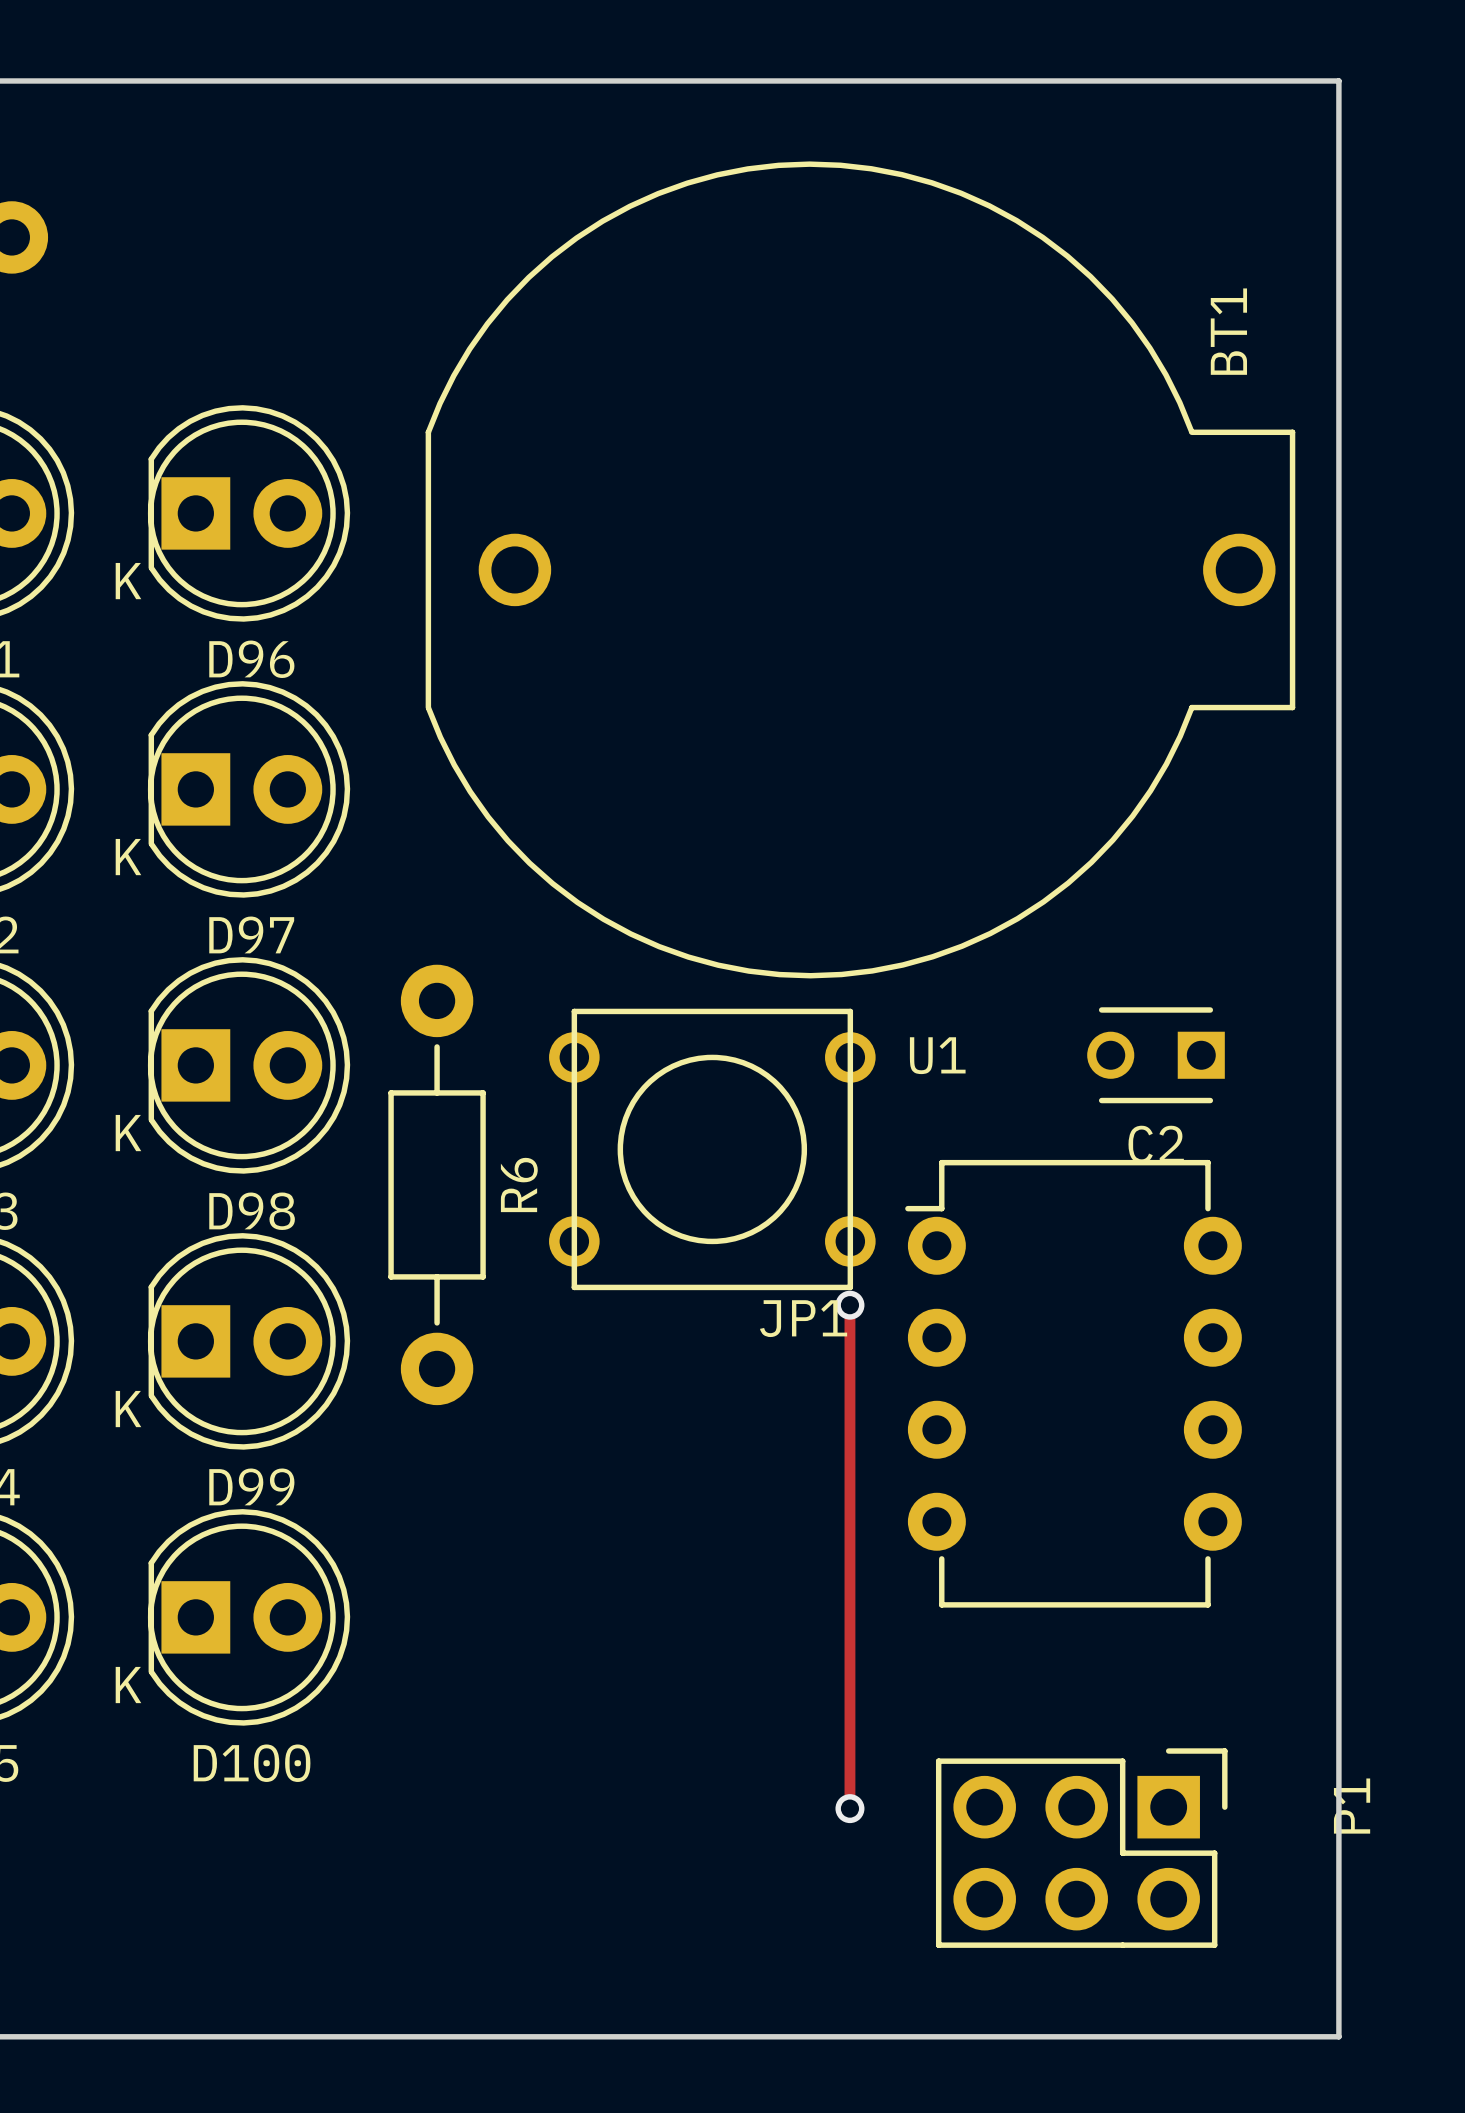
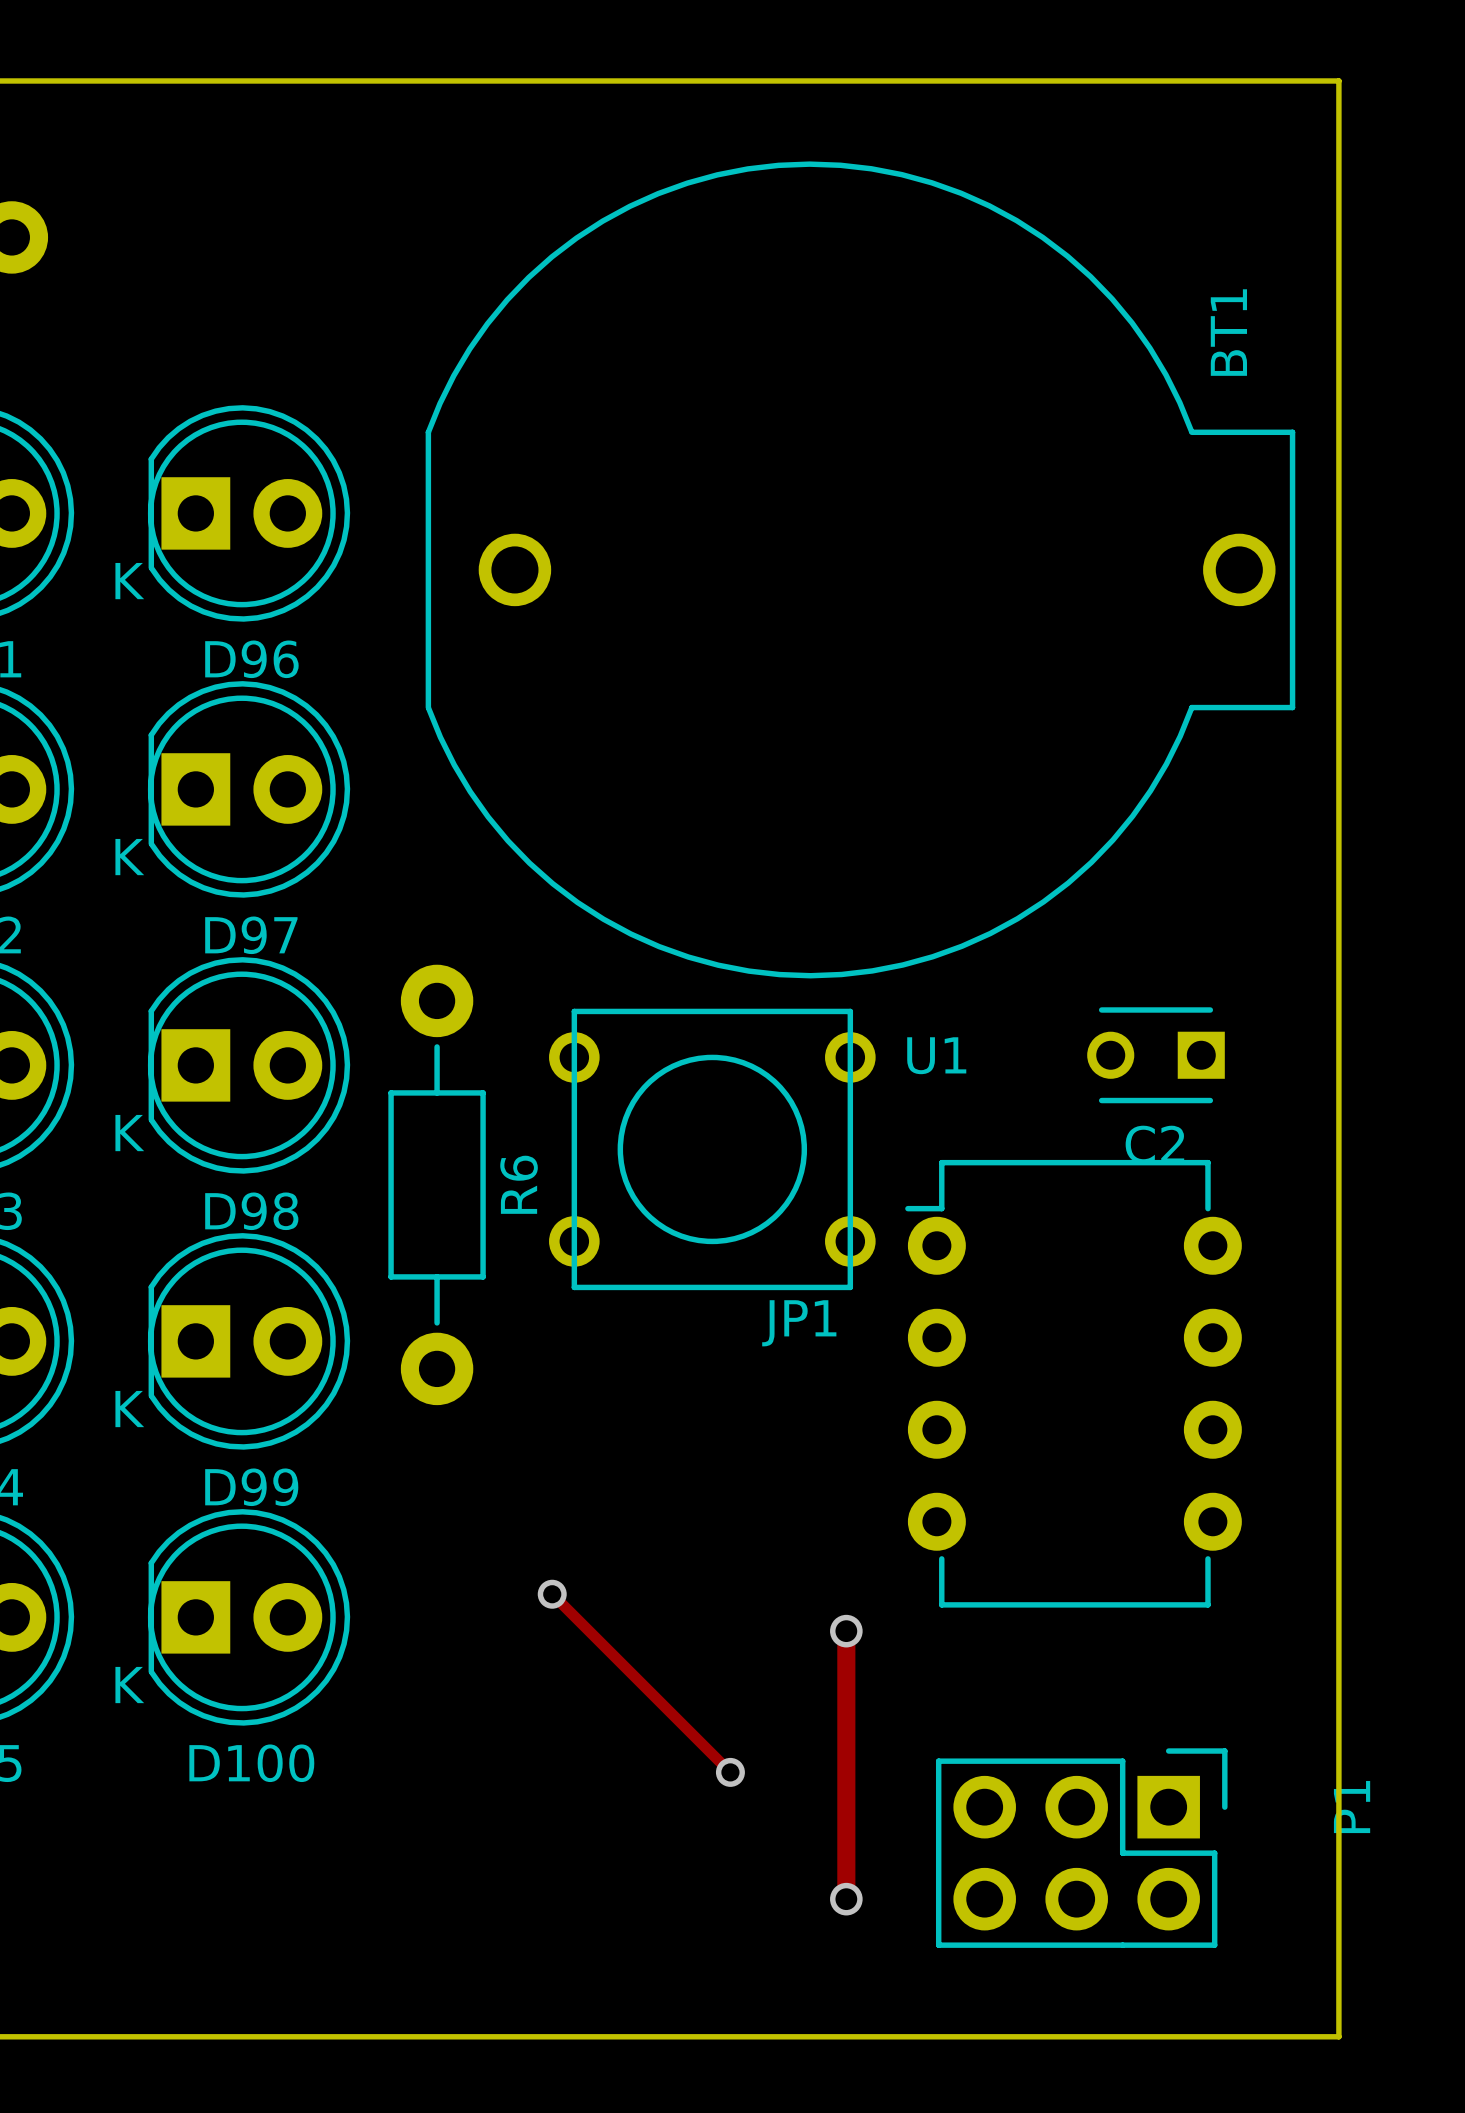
track: (849, 1305) (849, 1808) -> none
via: (849, 1305) -> none
track: none -> (552, 1594) (730, 1772)
via: none -> (552, 1594)
track: none -> (846, 1631) (846, 1899)
via: none -> (846, 1631)
via position: (849, 1808) -> (730, 1772)
via: none -> (846, 1899)

